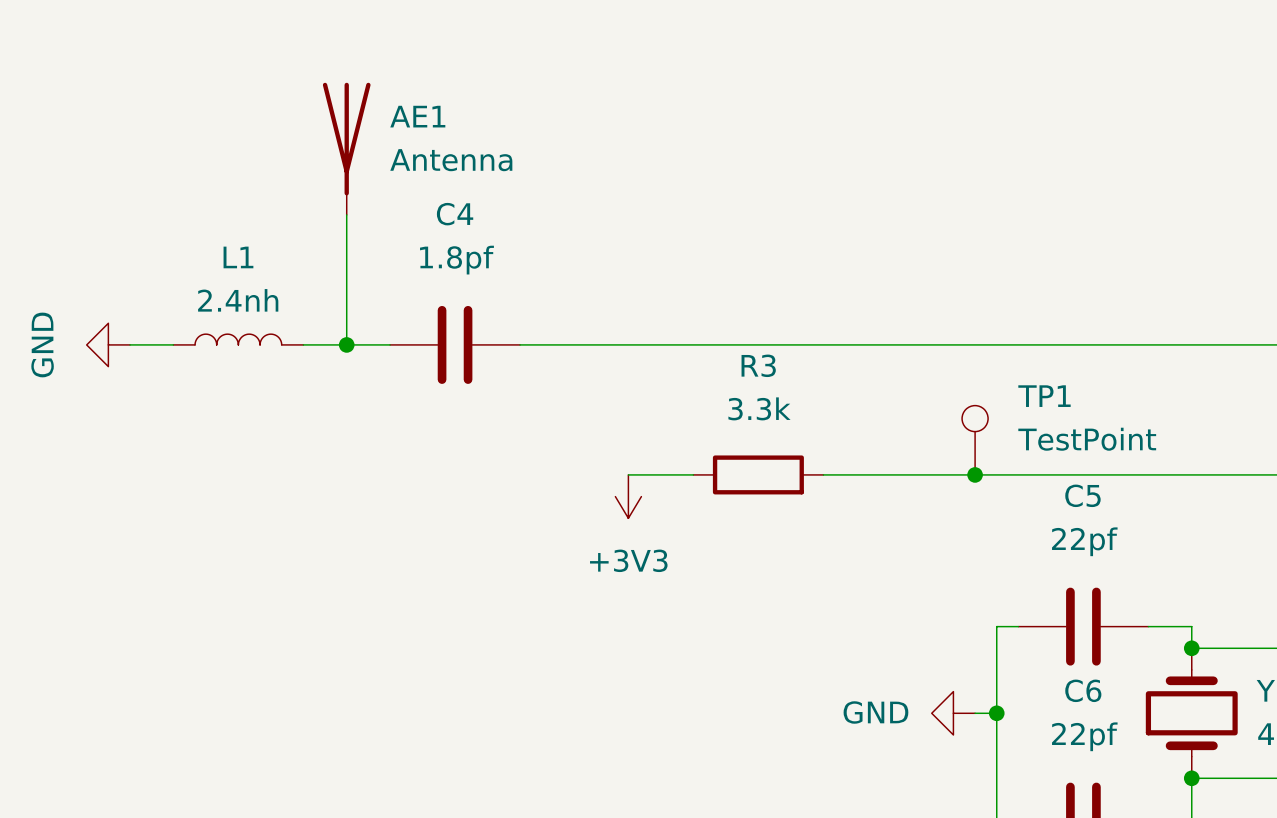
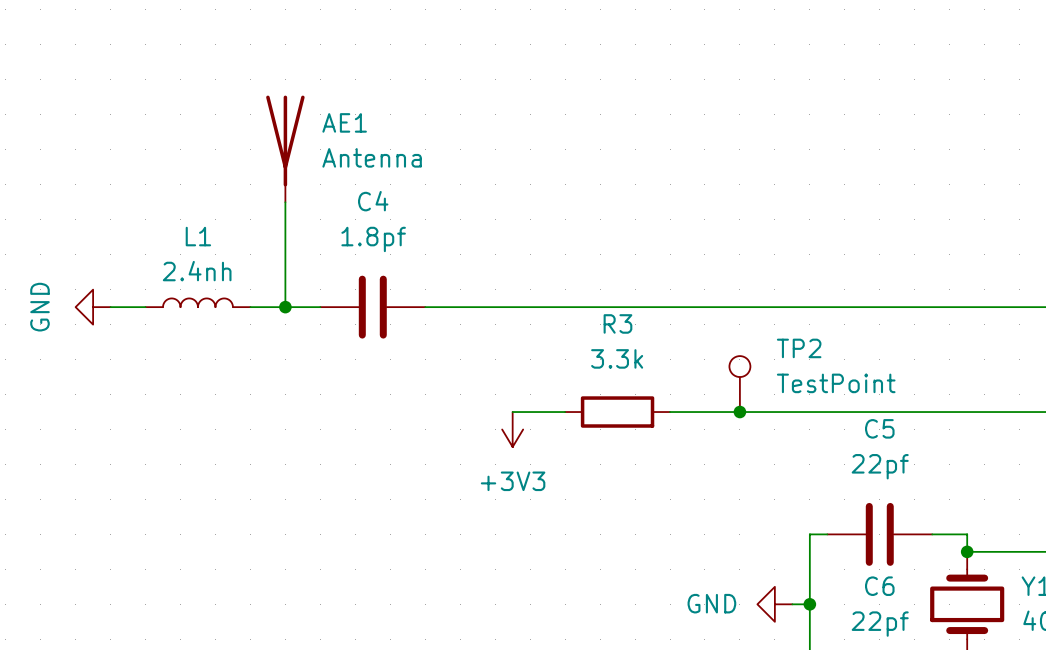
TP2: none -> TestPoint (739, 384)
TP1: TestPoint (975, 440) -> none
junction position: (975, 474) -> (739, 412)

